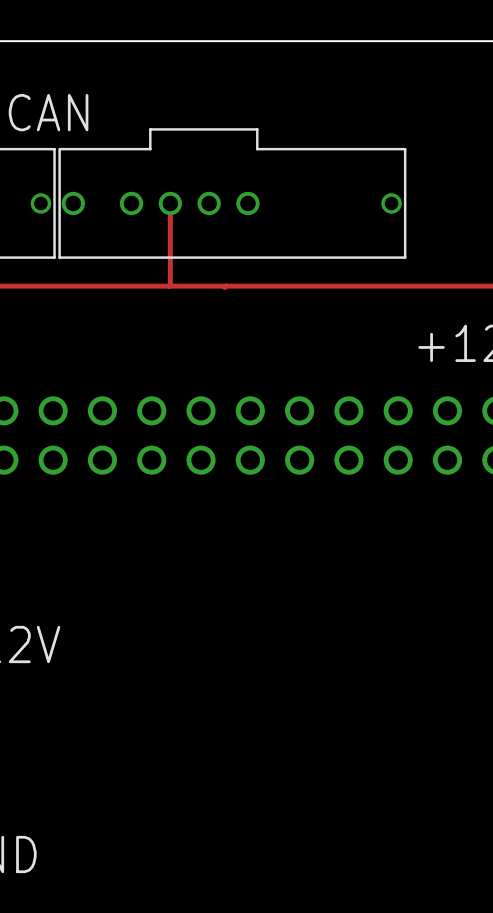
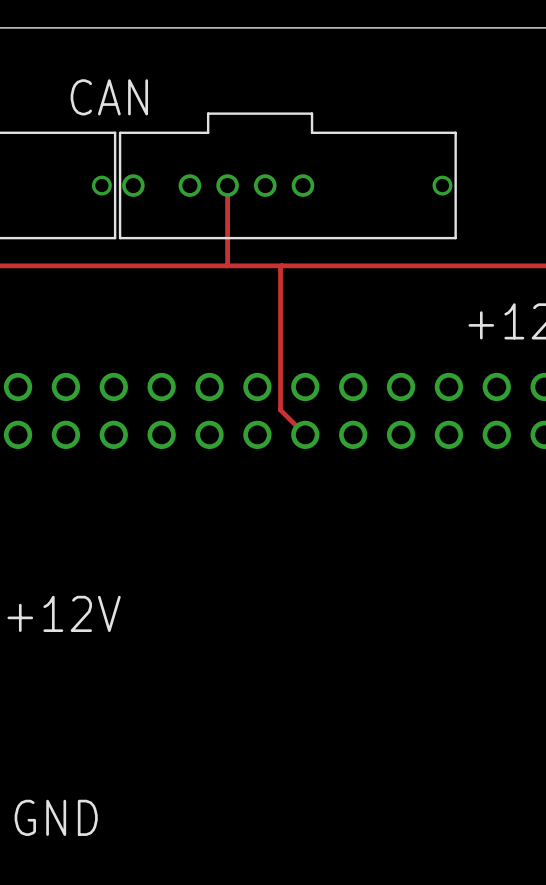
track: none -> (280, 267) (280, 410) (305, 434)

